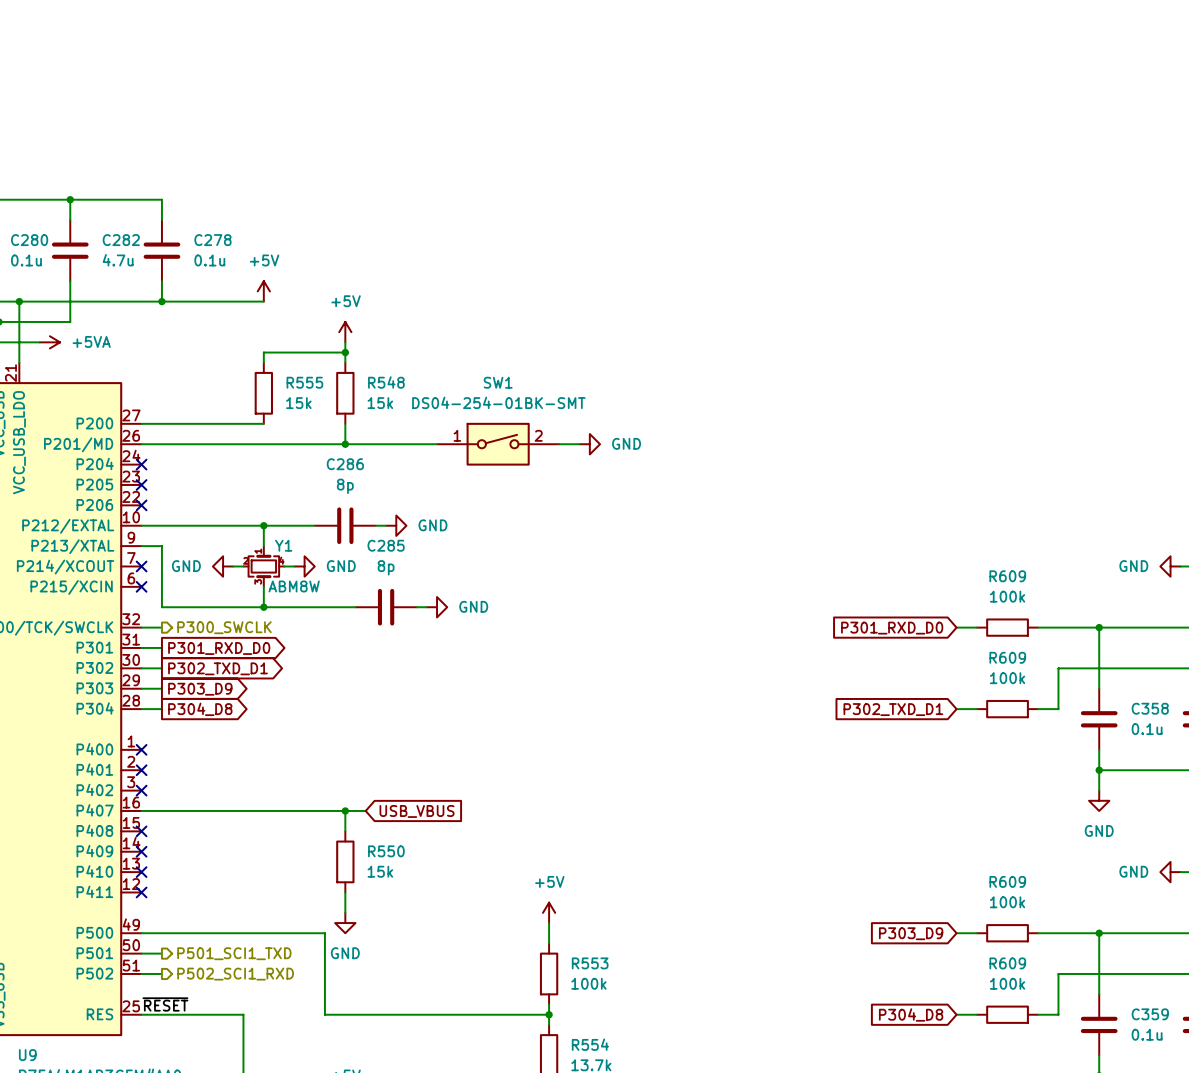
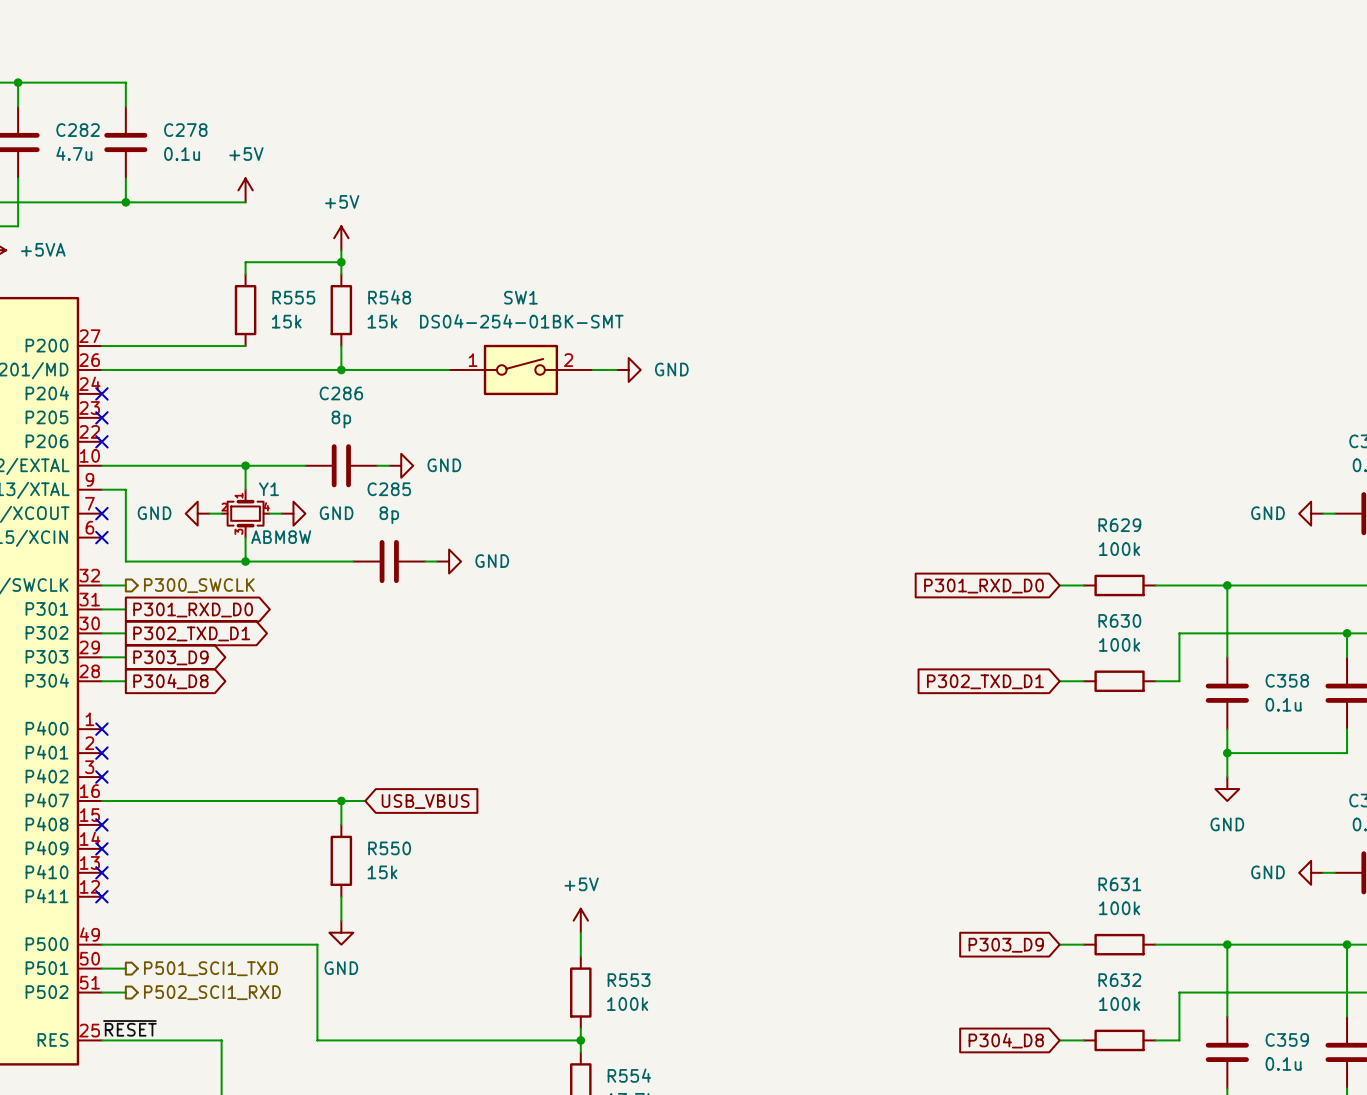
R609 name: R609 (1007, 576) -> R629 (1119, 525)
R609 name: R609 (1007, 657) -> R630 (1119, 620)
R609 name: R609 (1007, 881) -> R631 (1119, 884)
R609 name: R609 (1007, 963) -> R632 (1119, 980)

